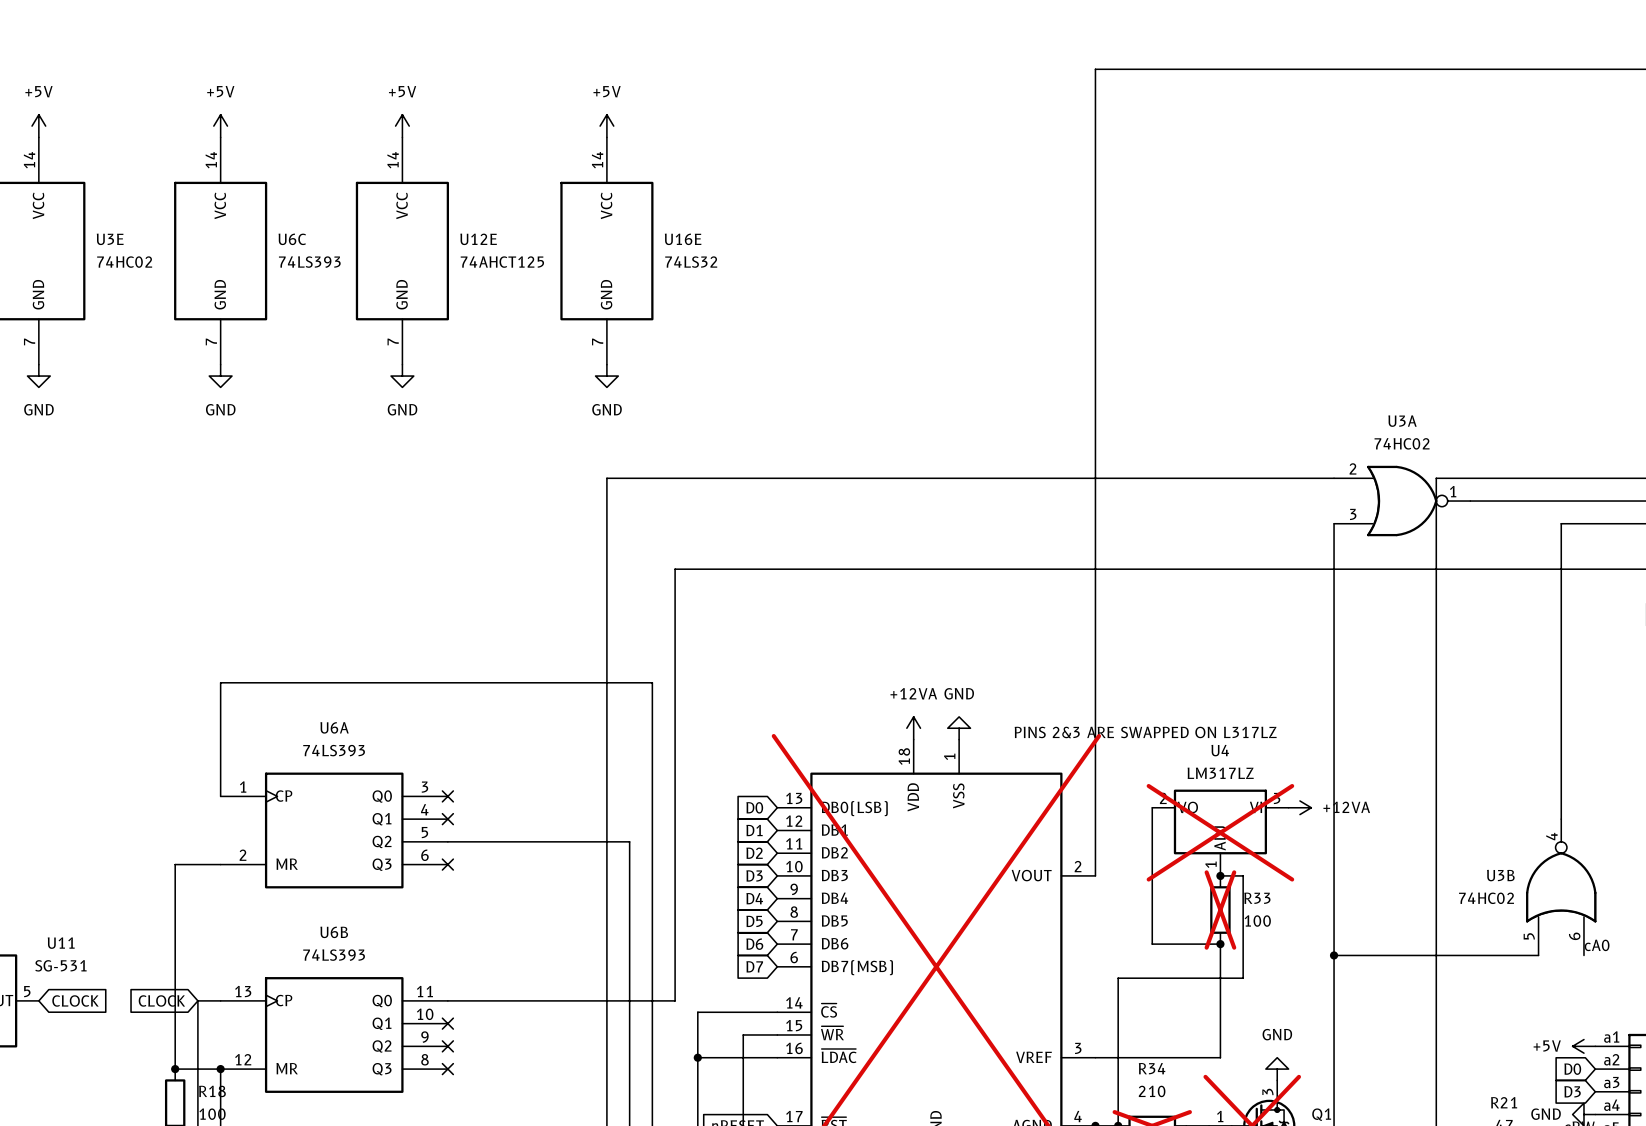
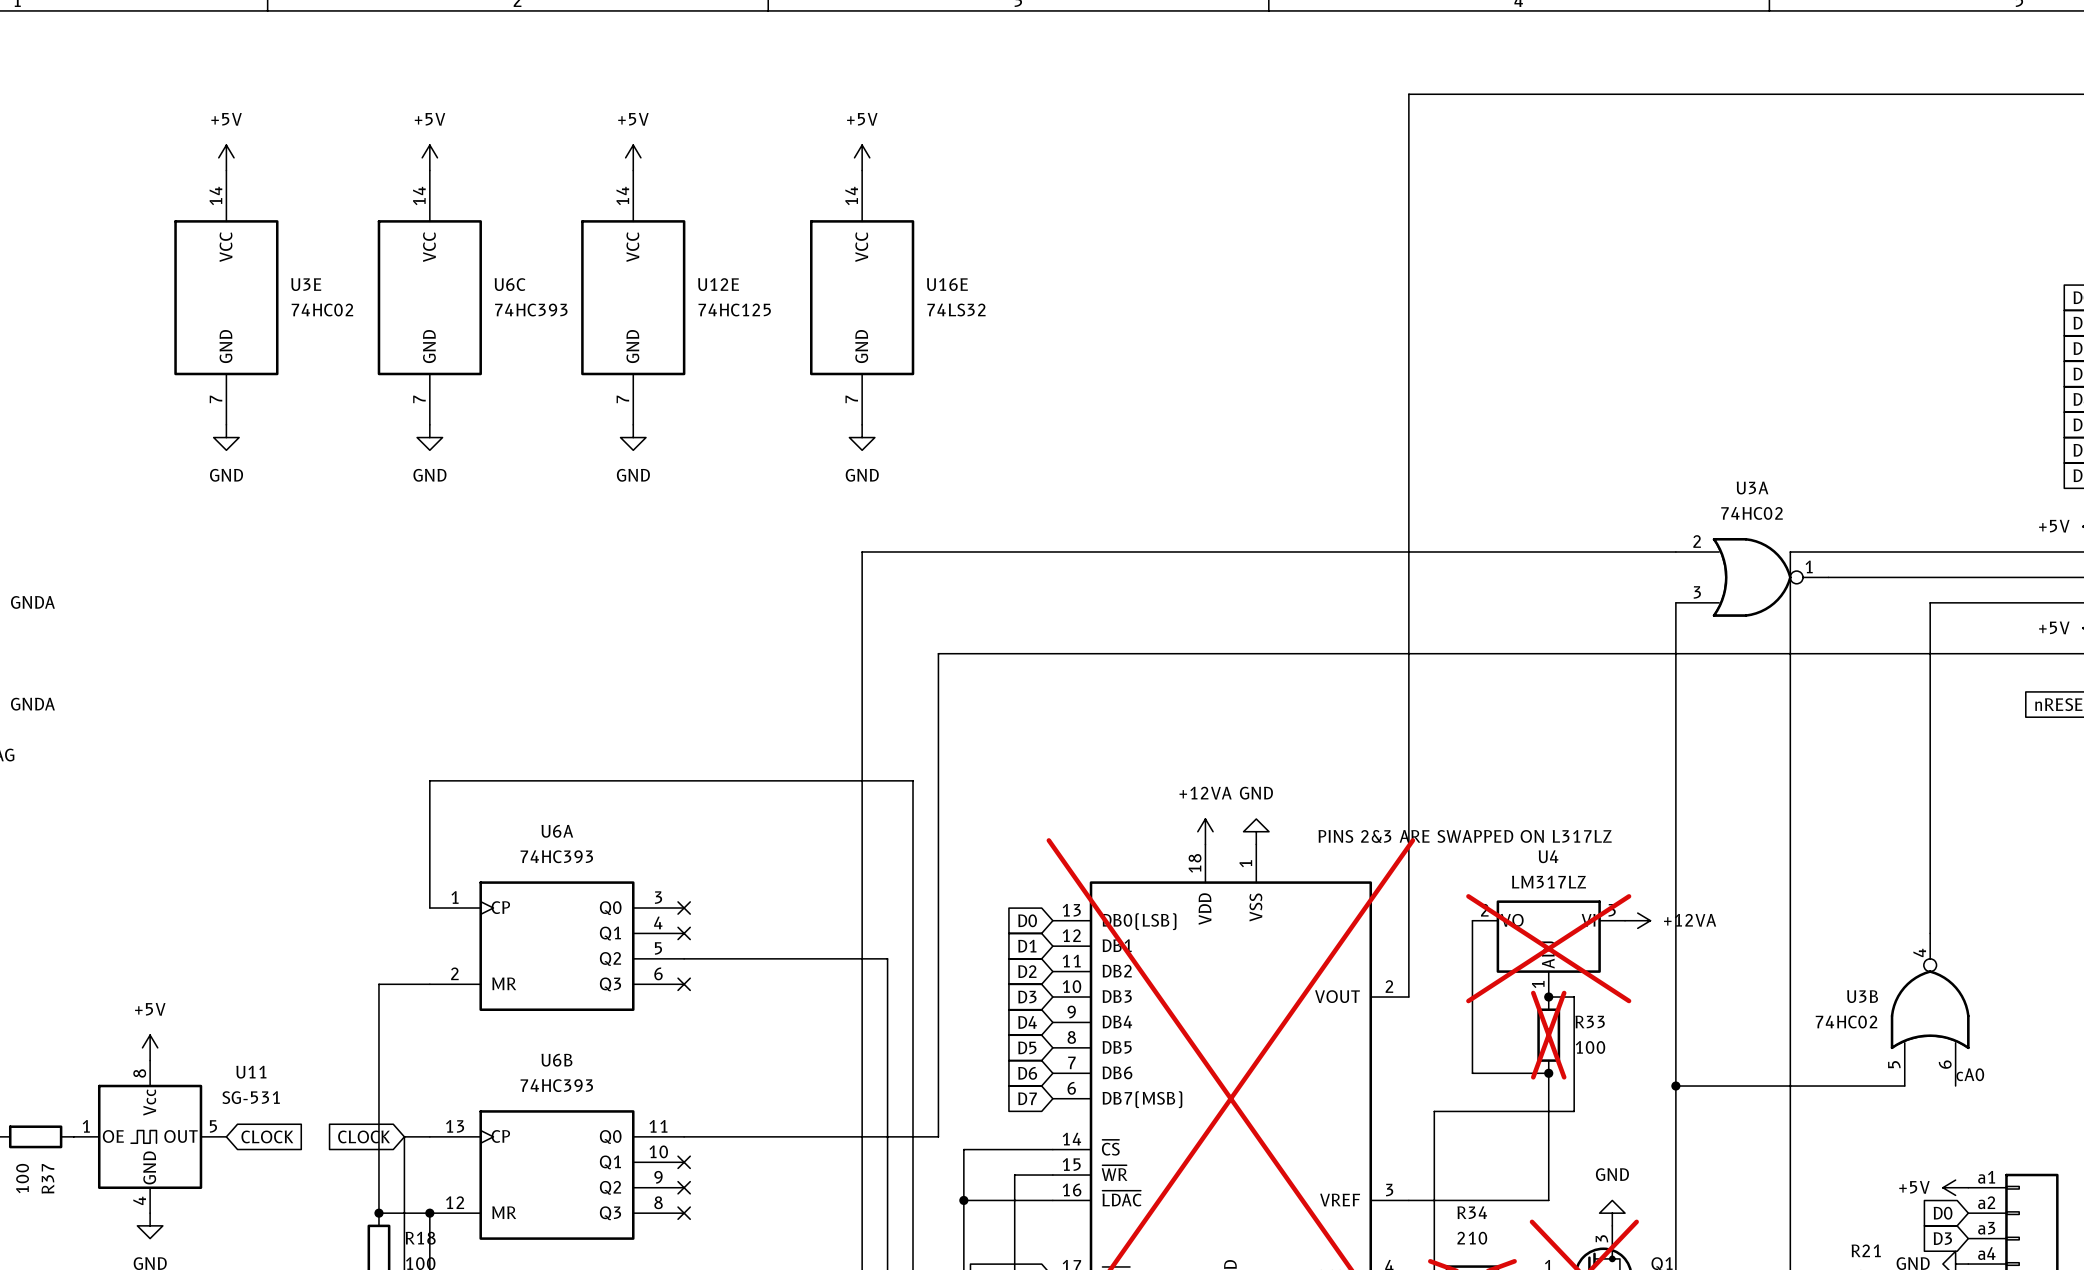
U6C value: 74LS393 (309, 262) -> 74HC393 (531, 310)
U12E value: 74AHCT125 (502, 262) -> 74HC125 (734, 310)
U6A value: 74LS393 (334, 750) -> 74HC393 (556, 856)
U6B value: 74LS393 (334, 955) -> 74HC393 (556, 1085)

